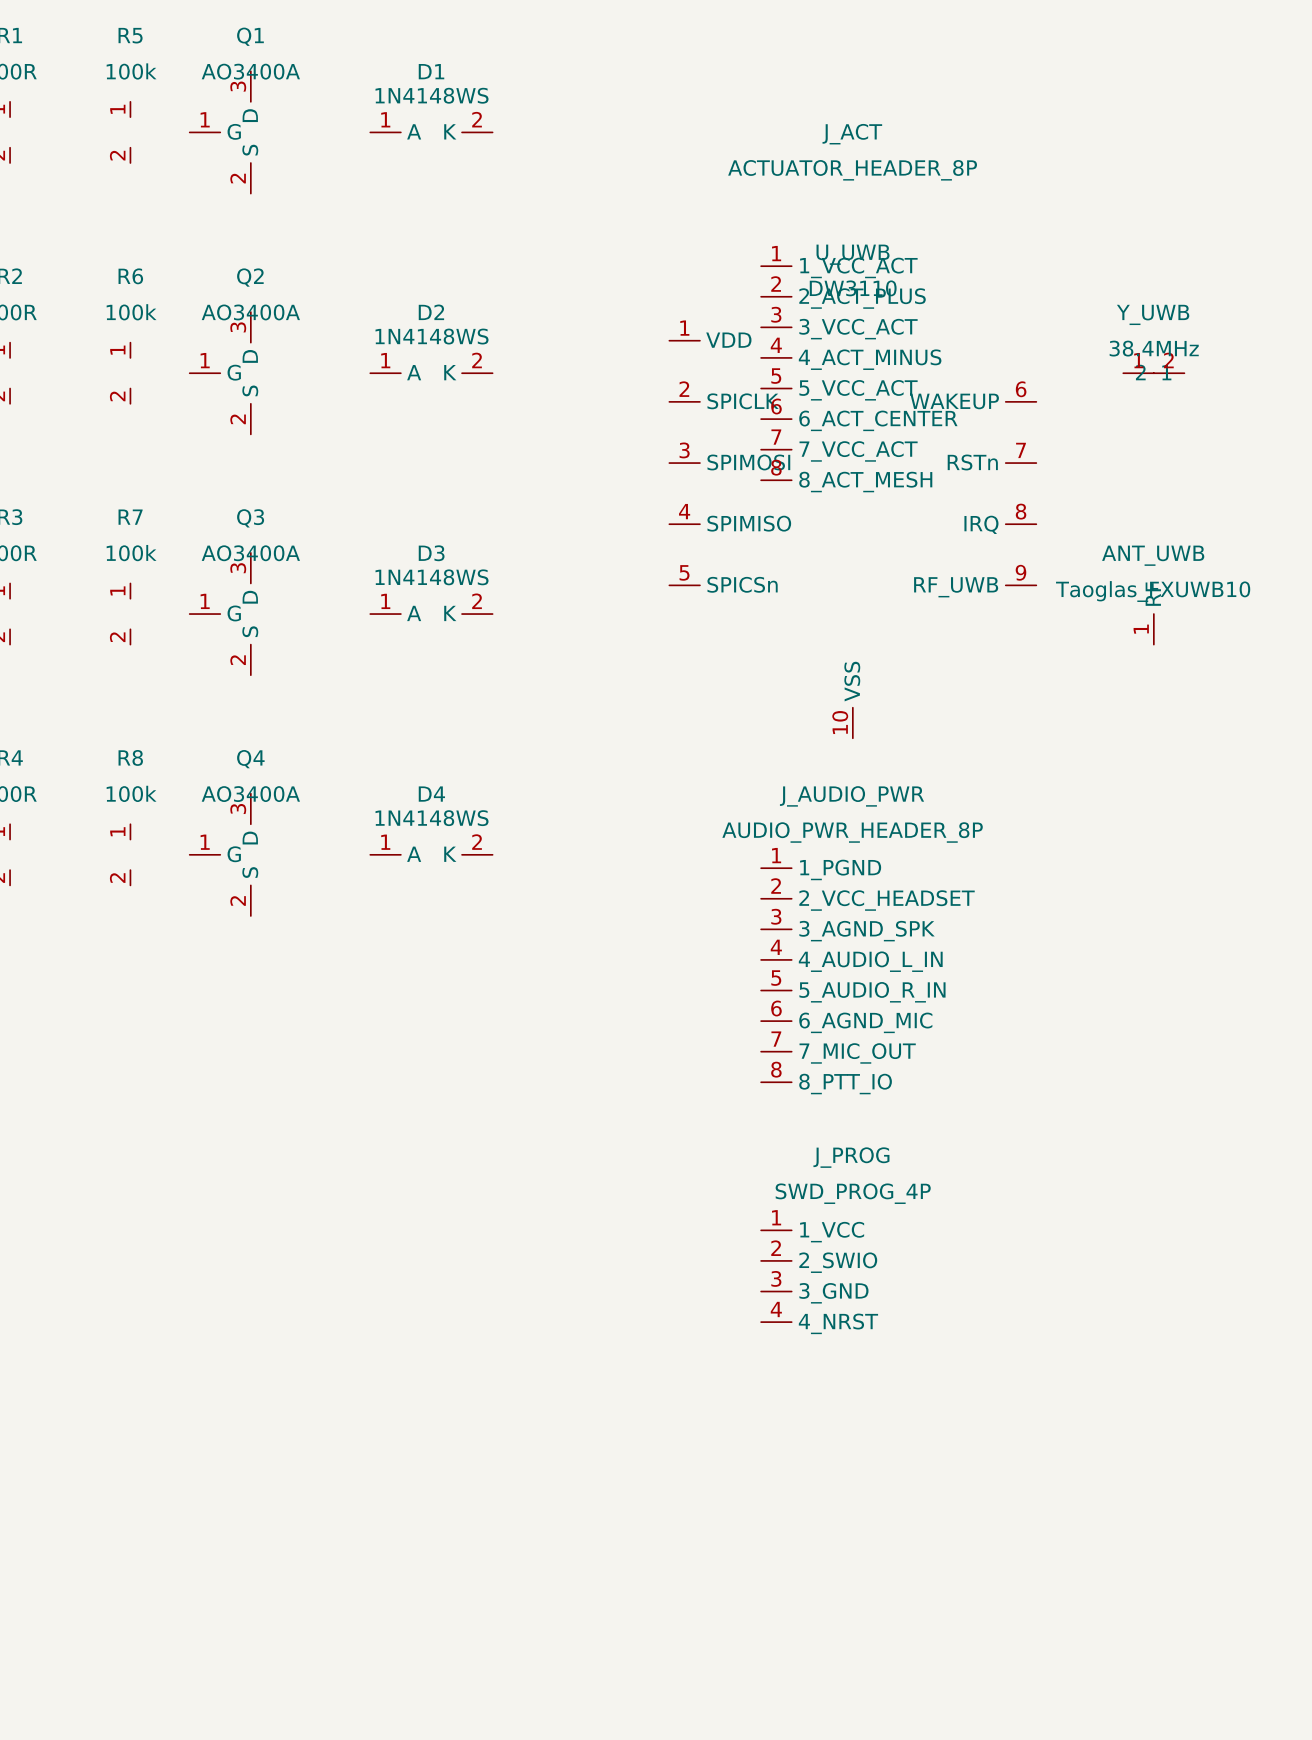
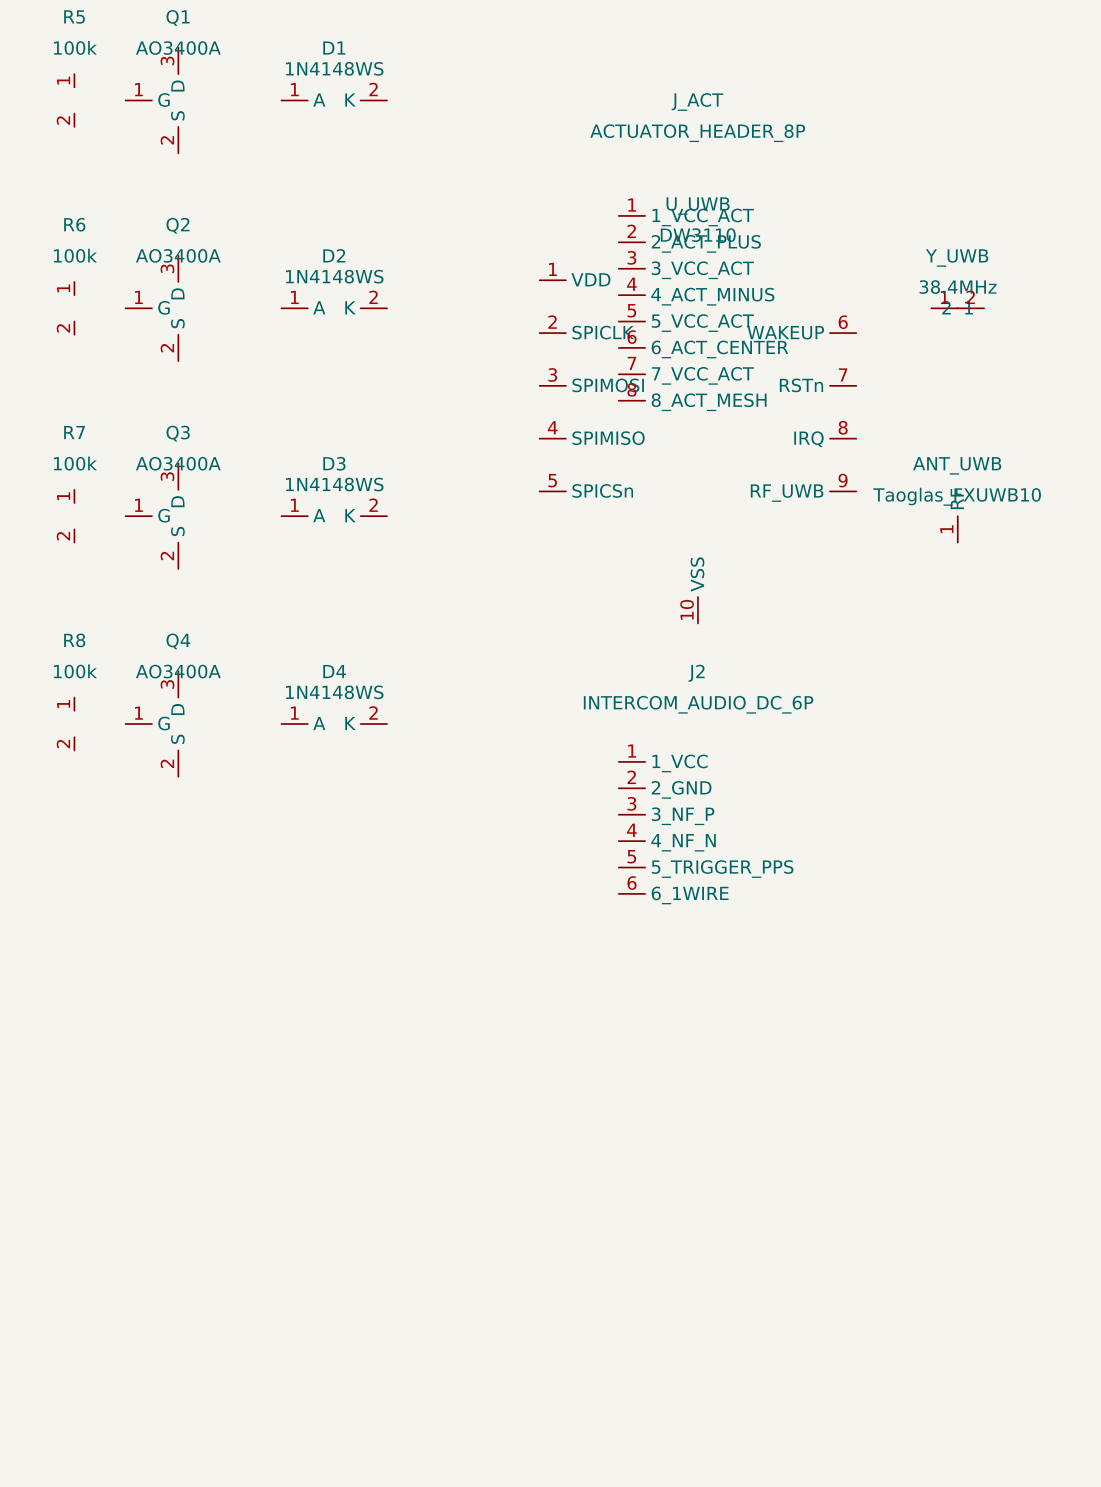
J_AUDIO_PWR: AUDIO_PWR_HEADER_8P (776, 975) -> none
J2: none -> INTERCOM_AUDIO_DC_6P (631, 827)
J_PROG: SWD_PROG_4P (776, 1276) -> none

